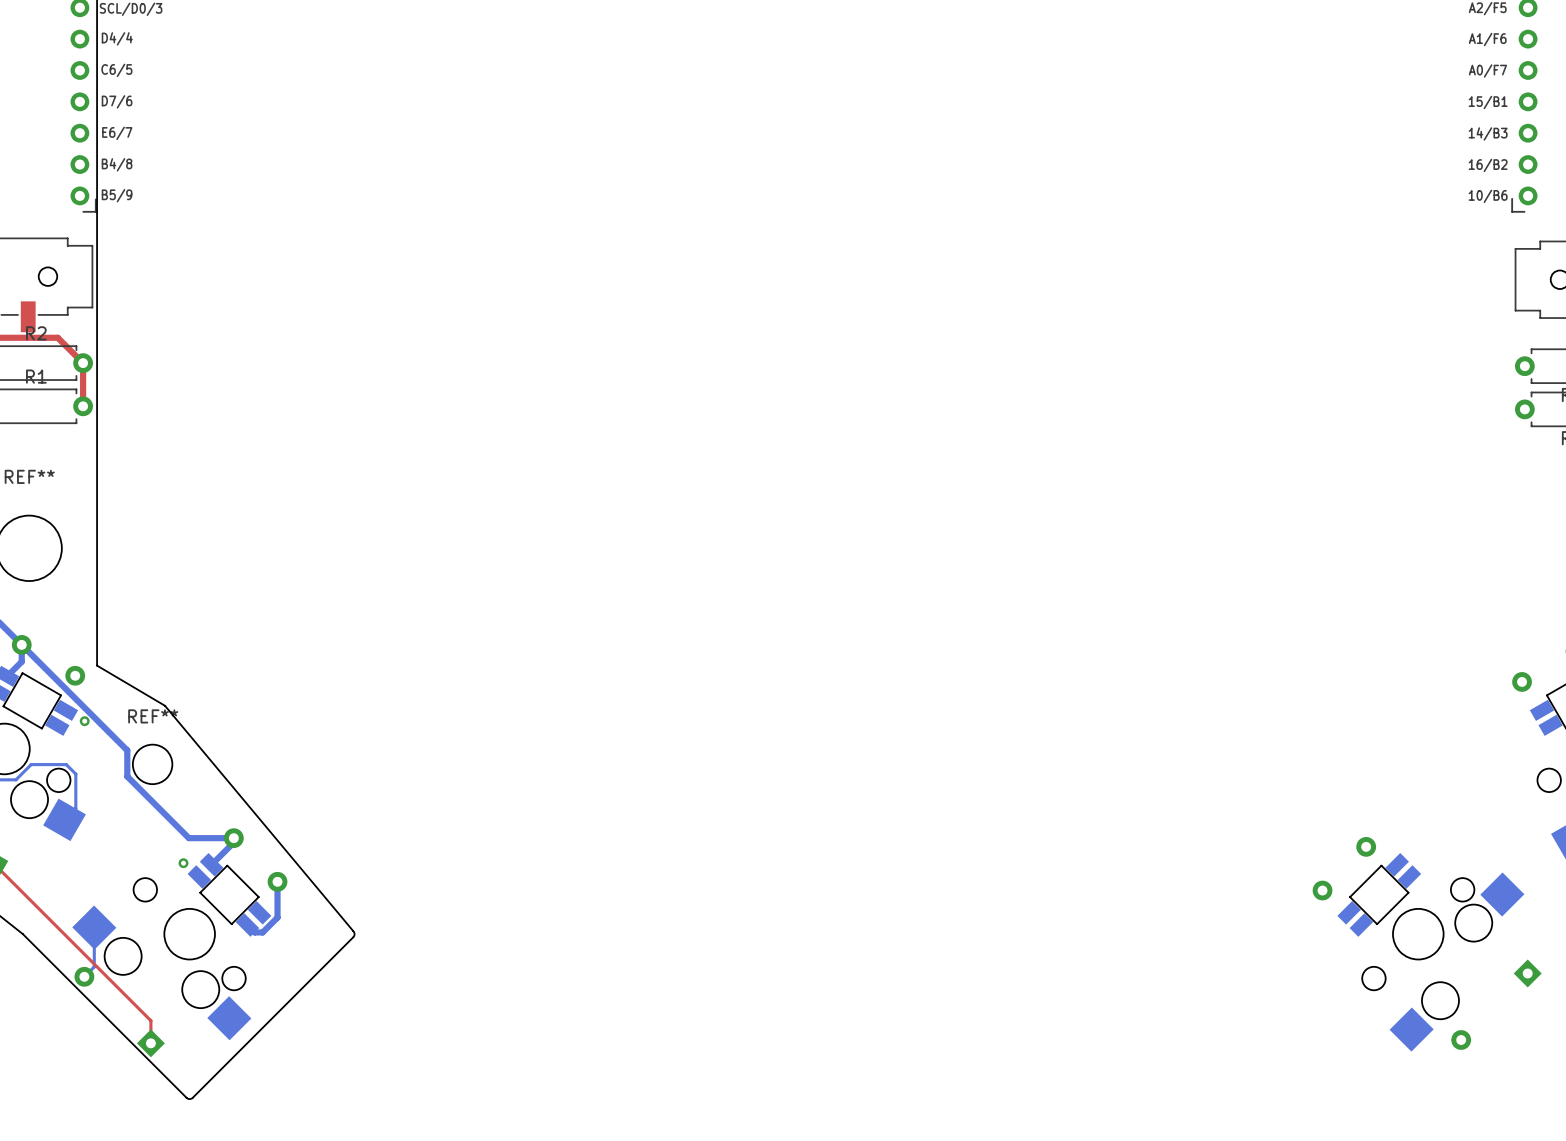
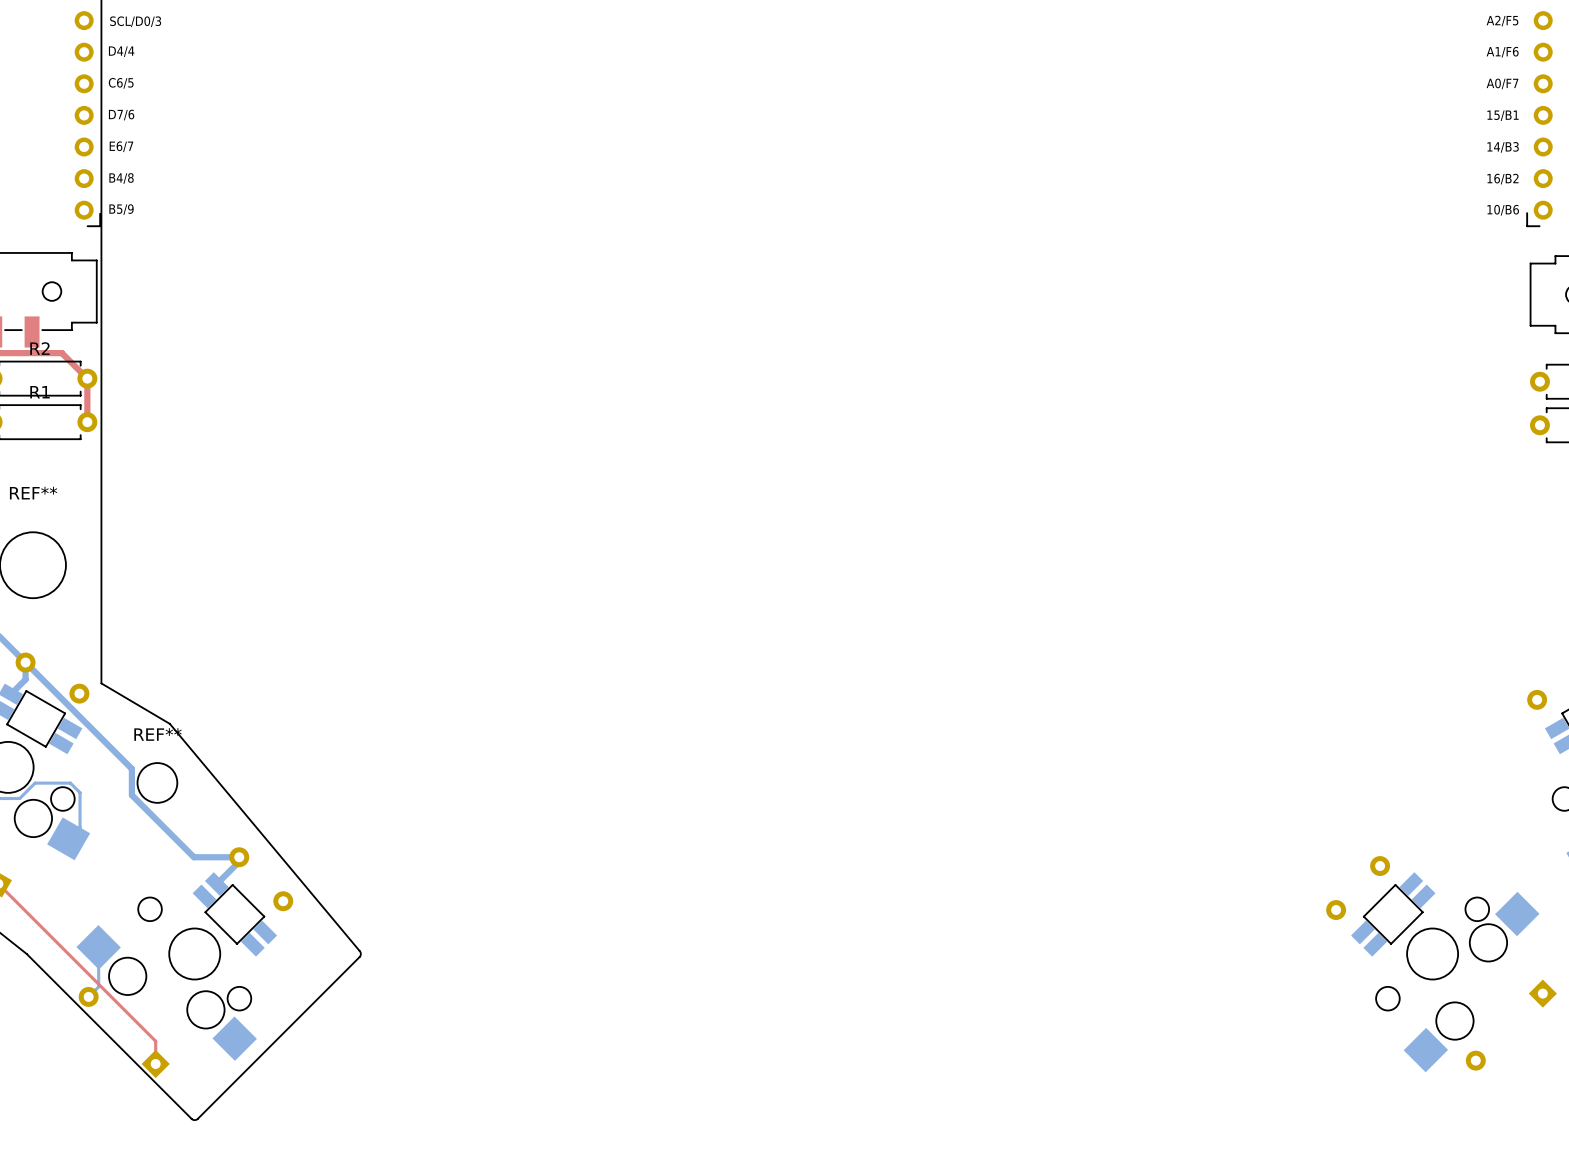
via: (84, 721) -> none
via: (183, 863) -> none
bottom track: (277, 881) (277, 917) (262, 932) (254, 932) (247, 925) -> none

